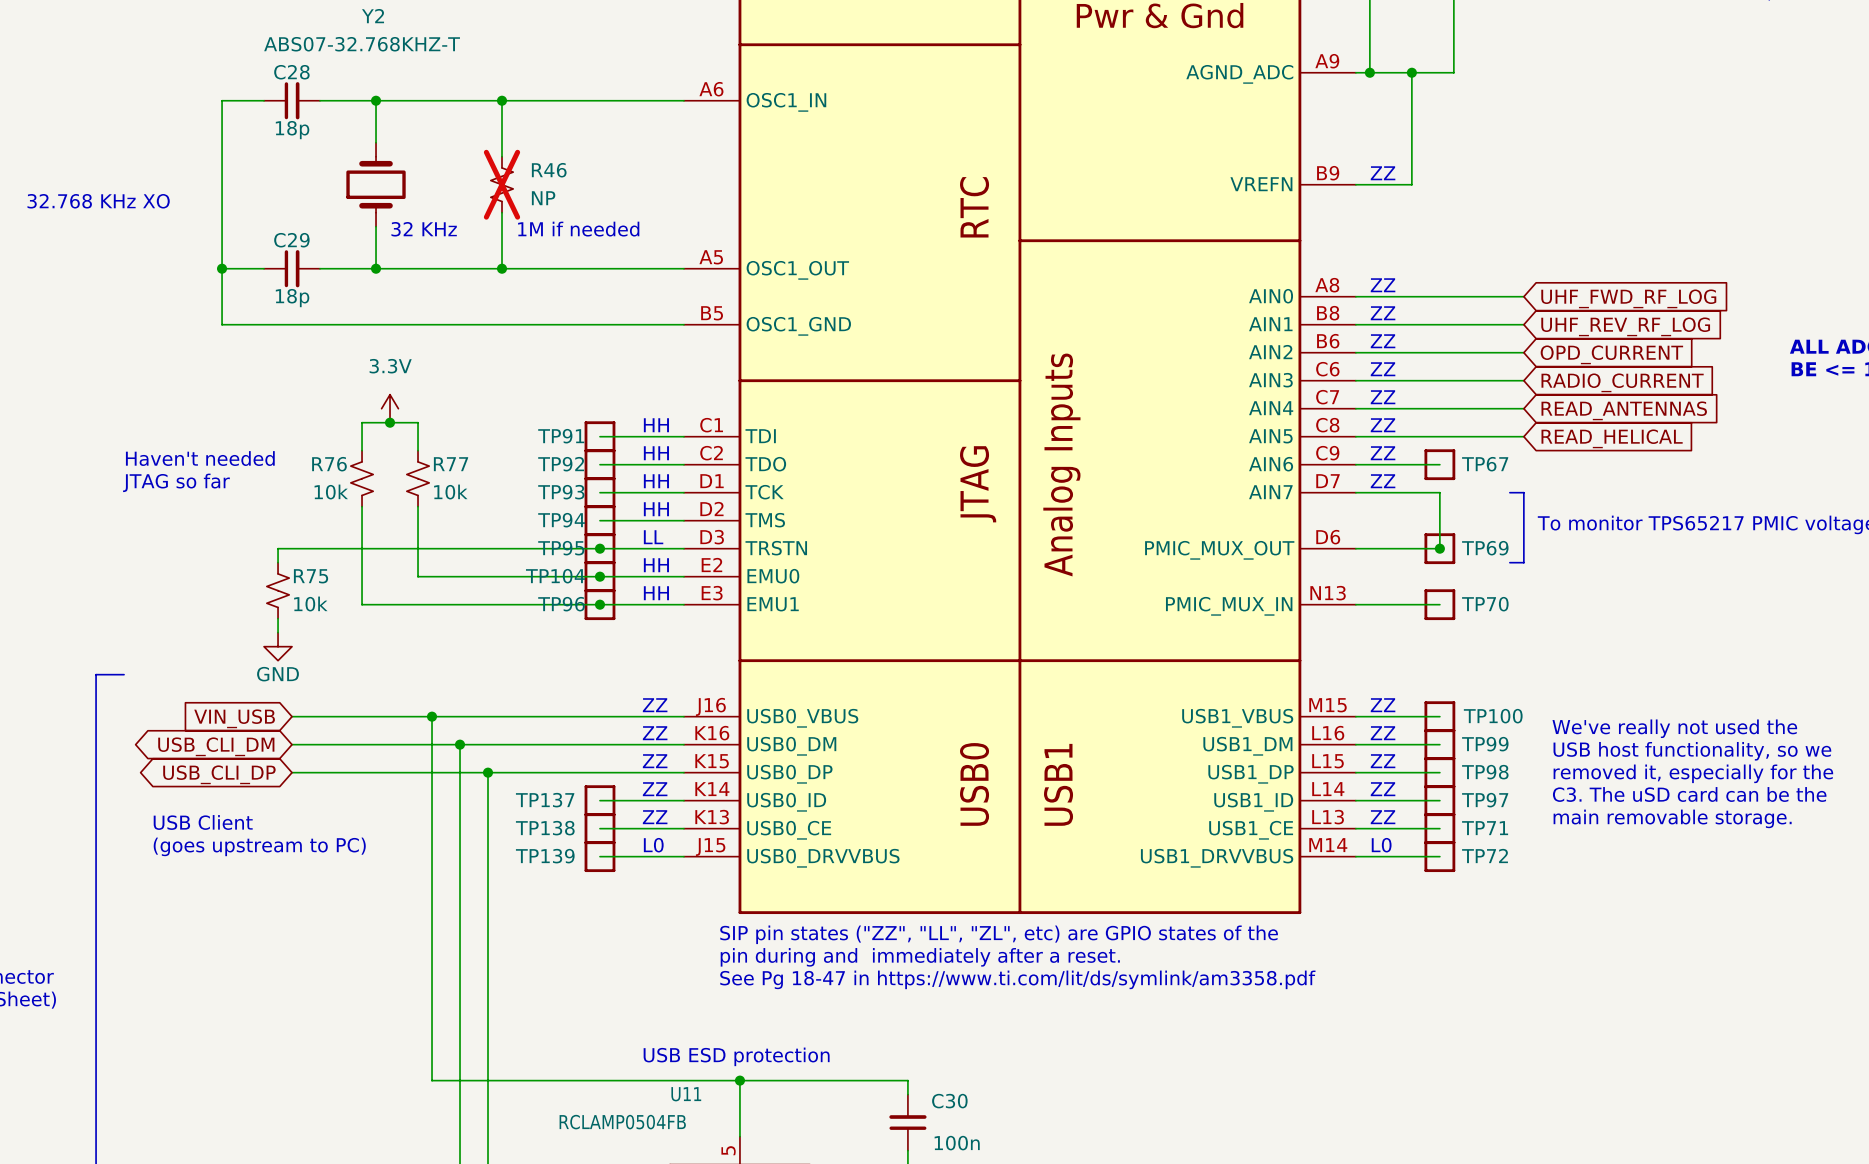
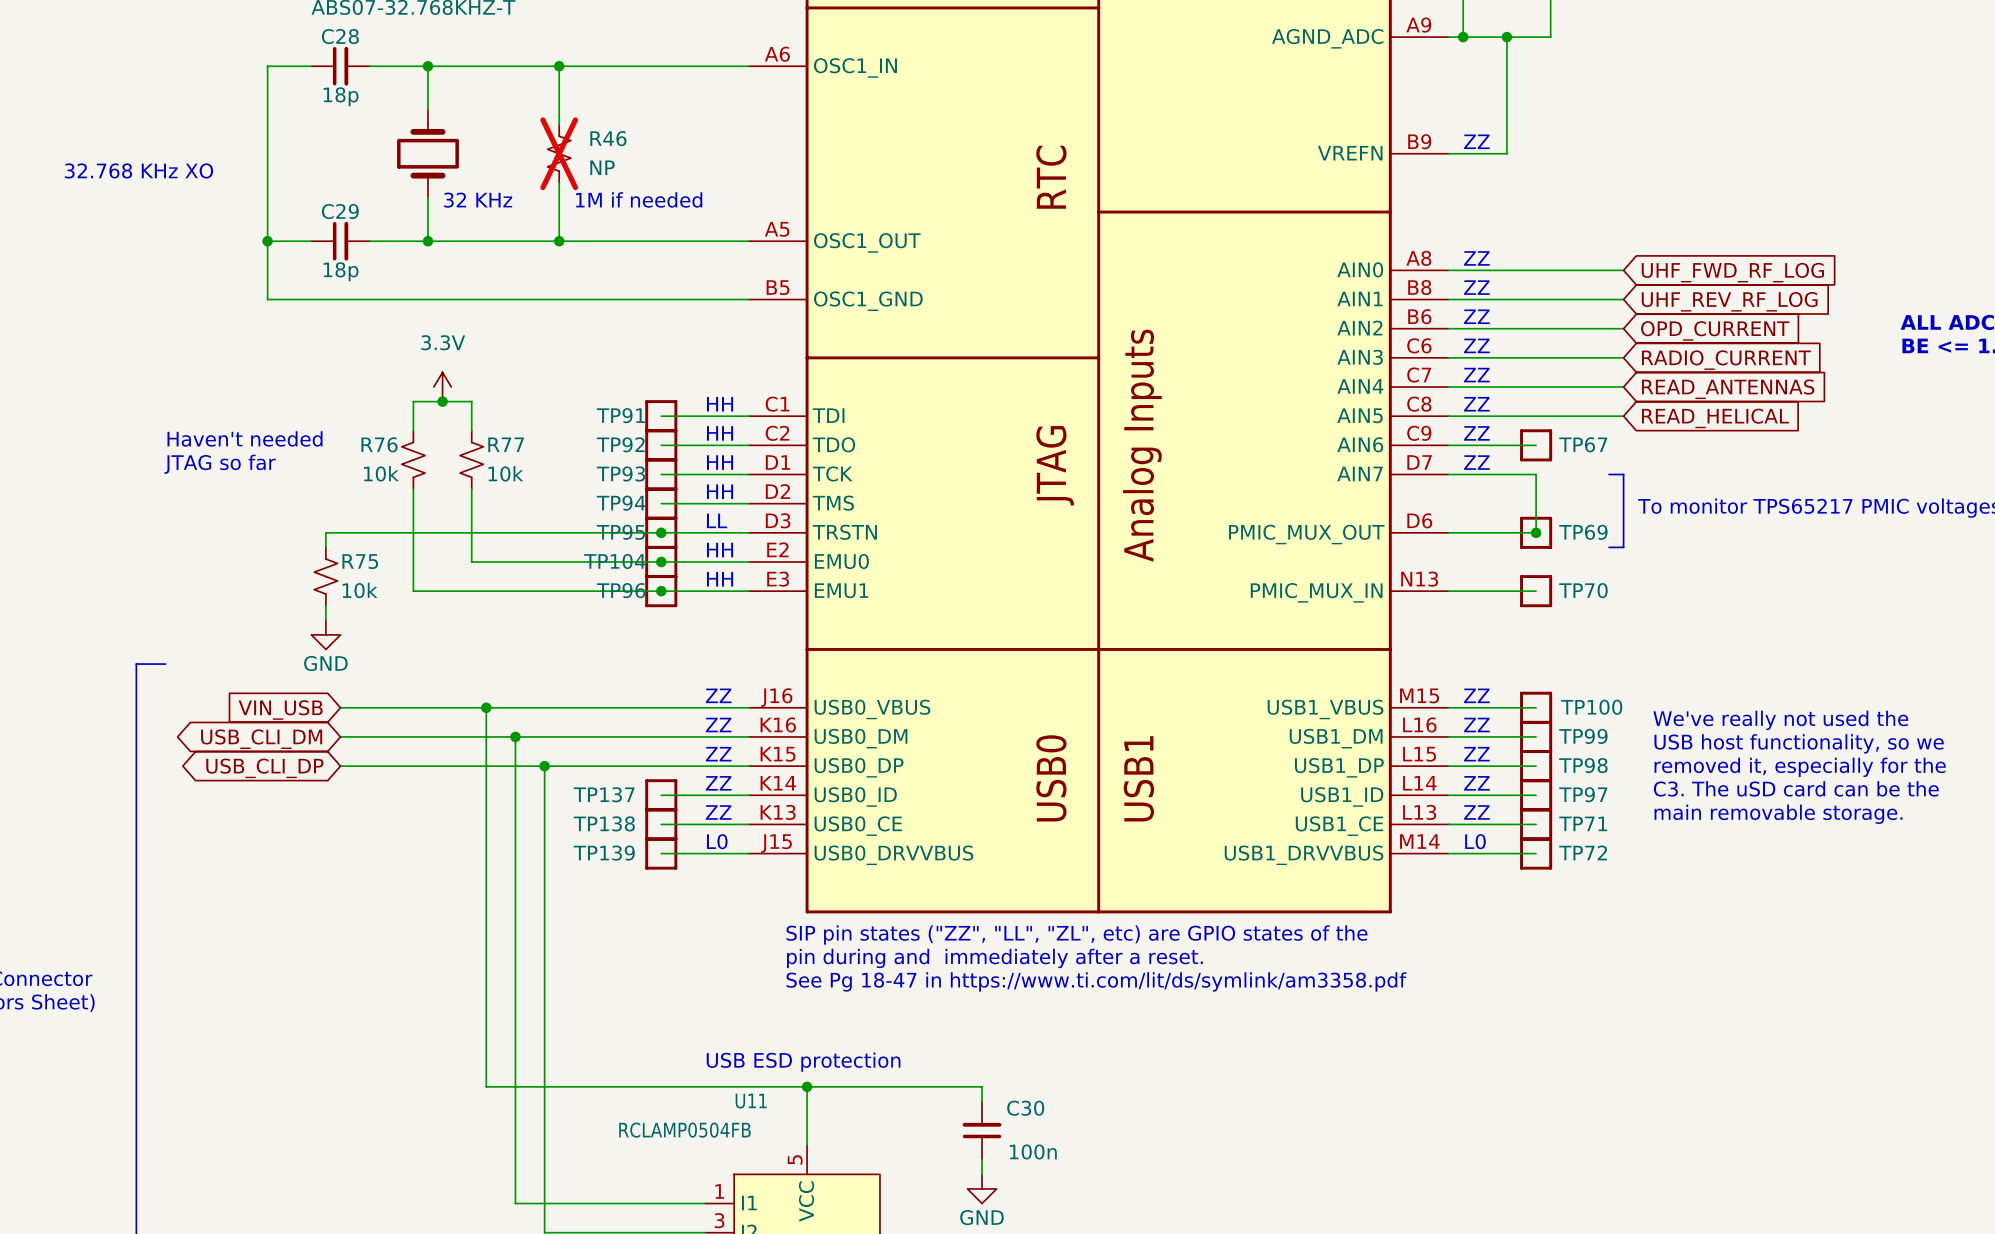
text: USB Client (203, 822) -> none
text: (goes upstream to PC) (259, 846) -> none

